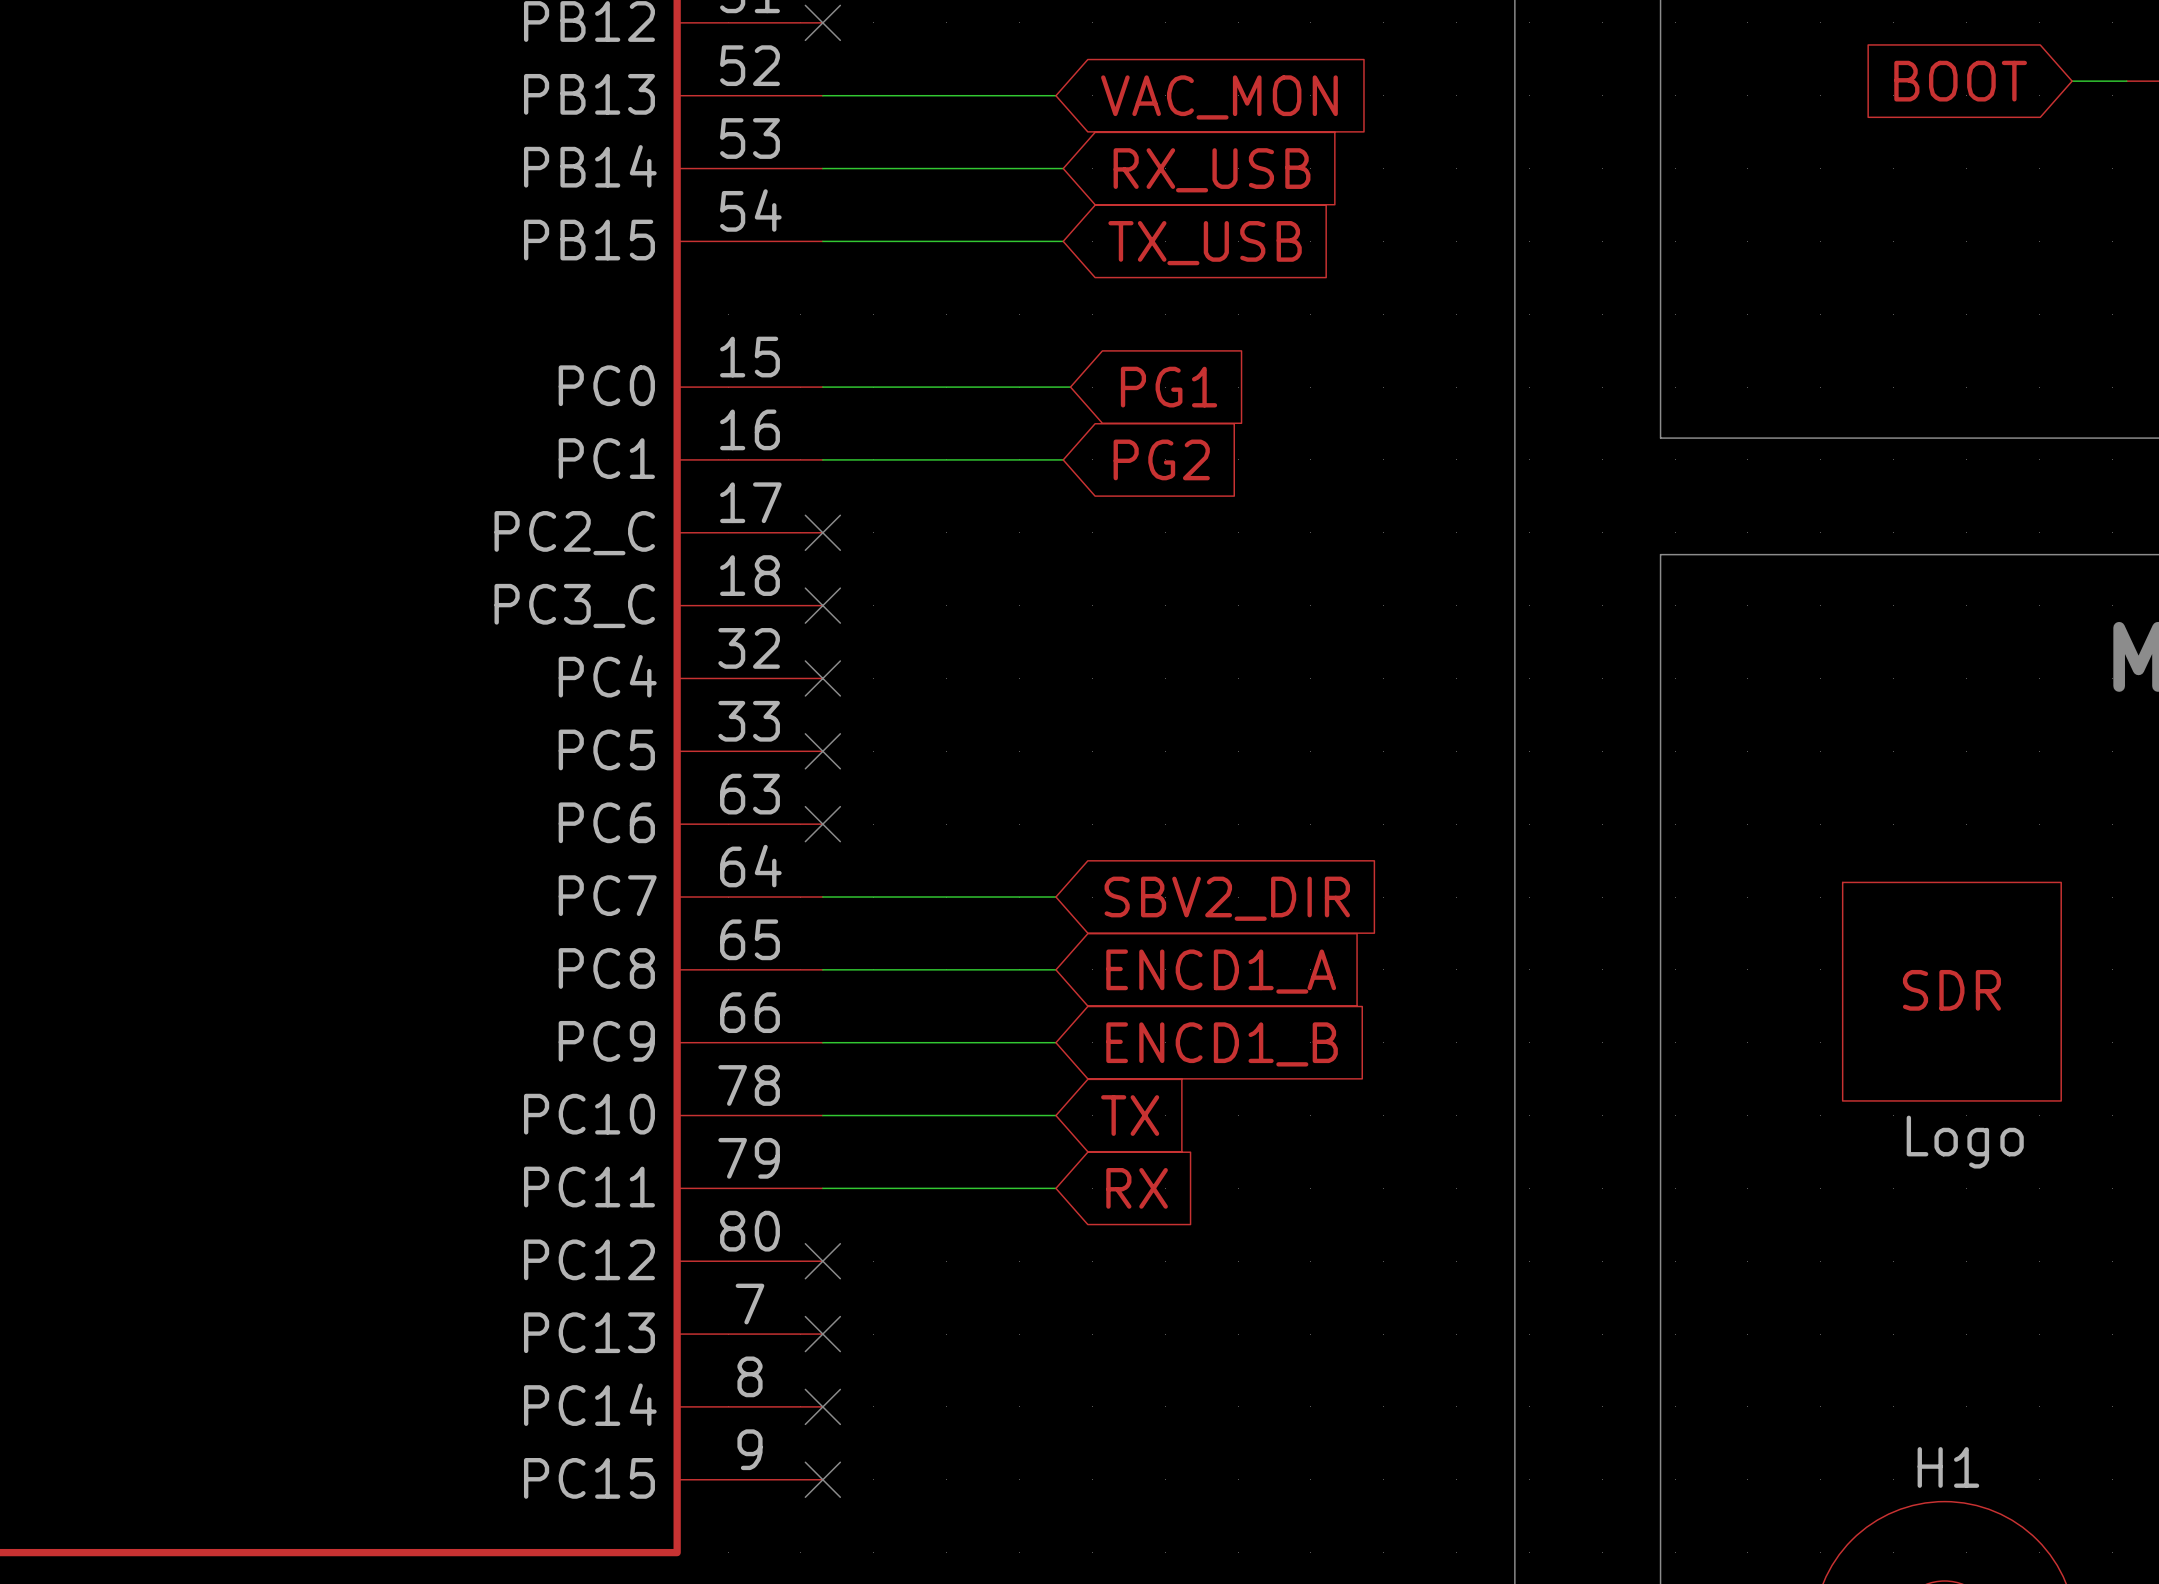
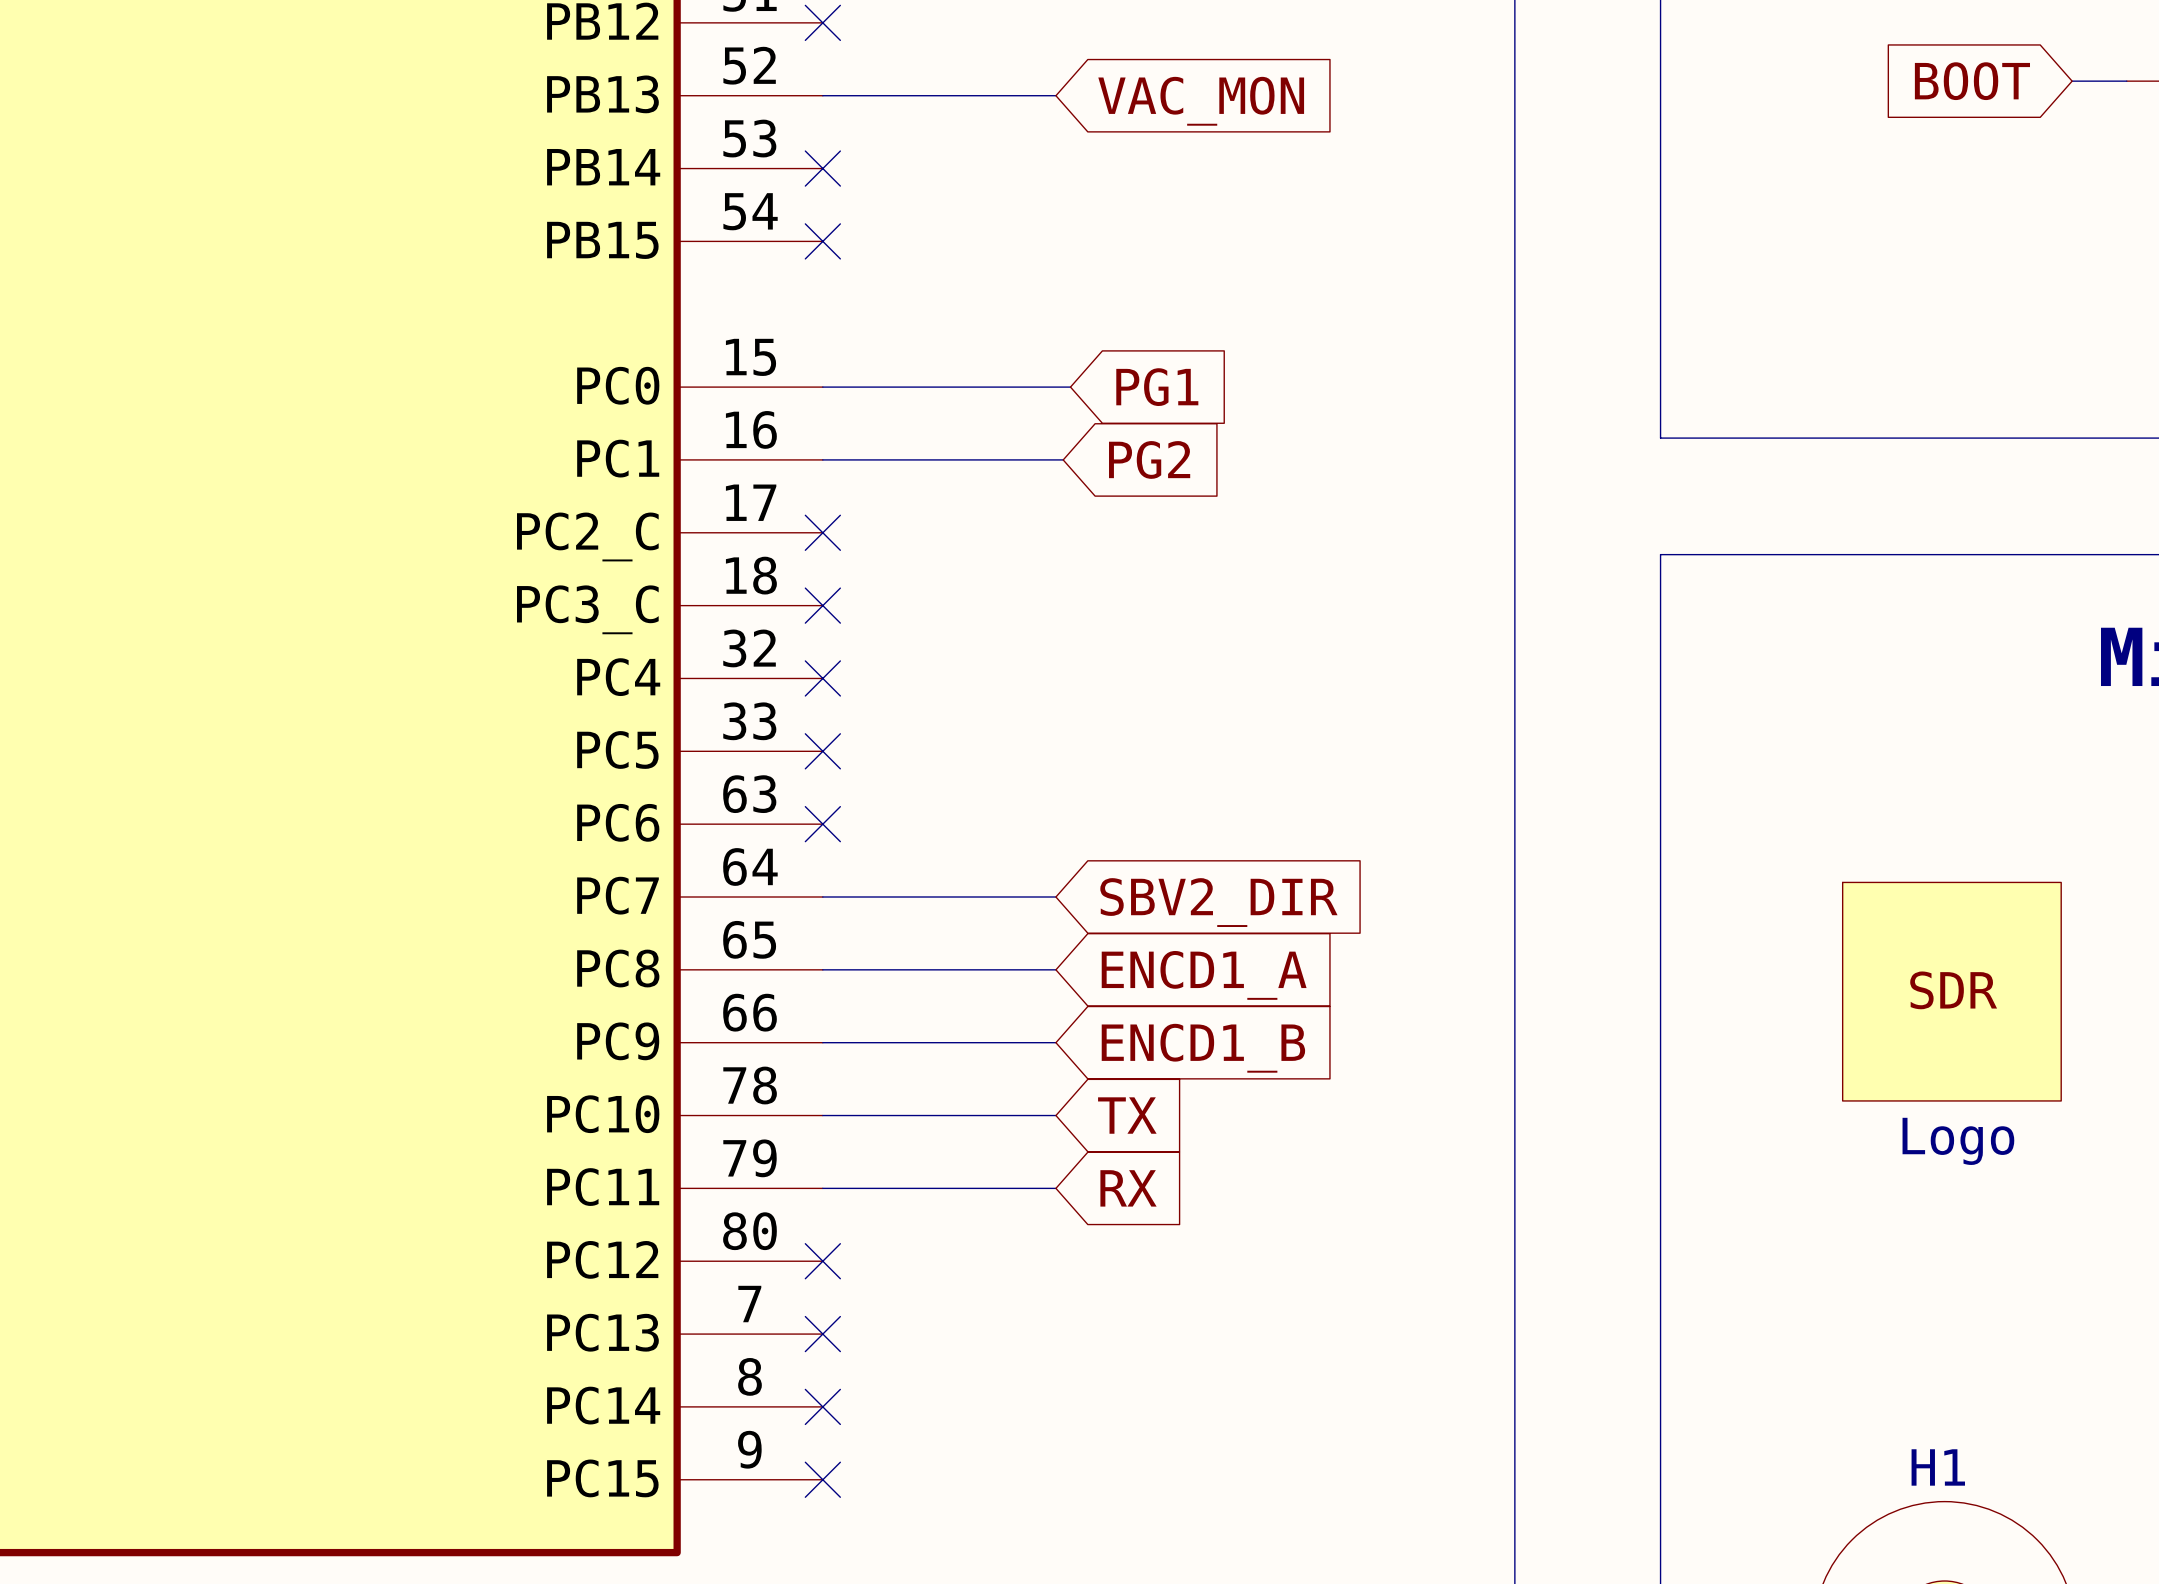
wire: (822, 168) (1063, 168) -> none
no-connect mark: none -> (822, 168)
global label: RX_USB (1212, 170) -> none
wire: (822, 241) (1063, 241) -> none
no-connect mark: none -> (822, 241)
global label: TX_USB (1205, 243) -> none

